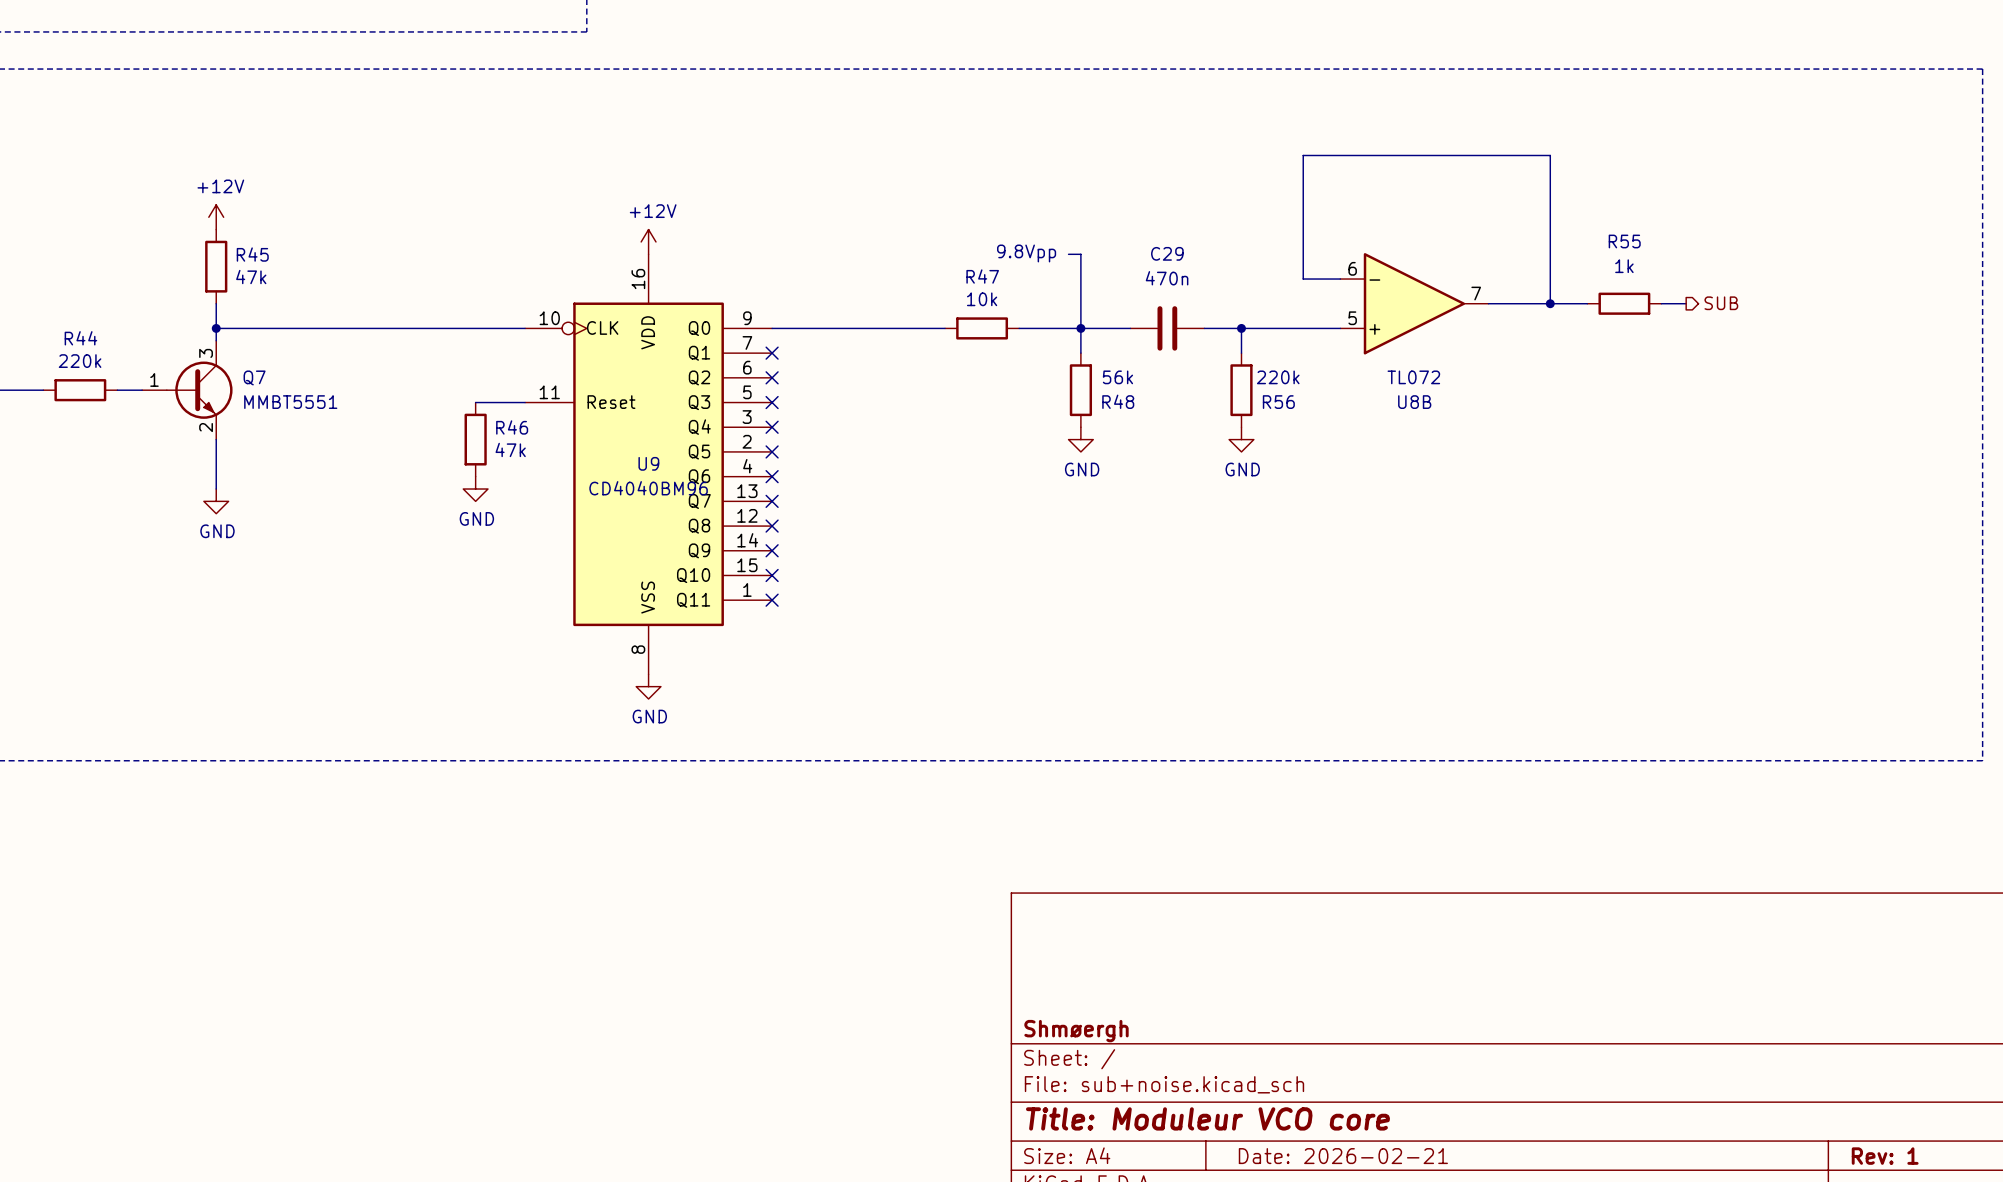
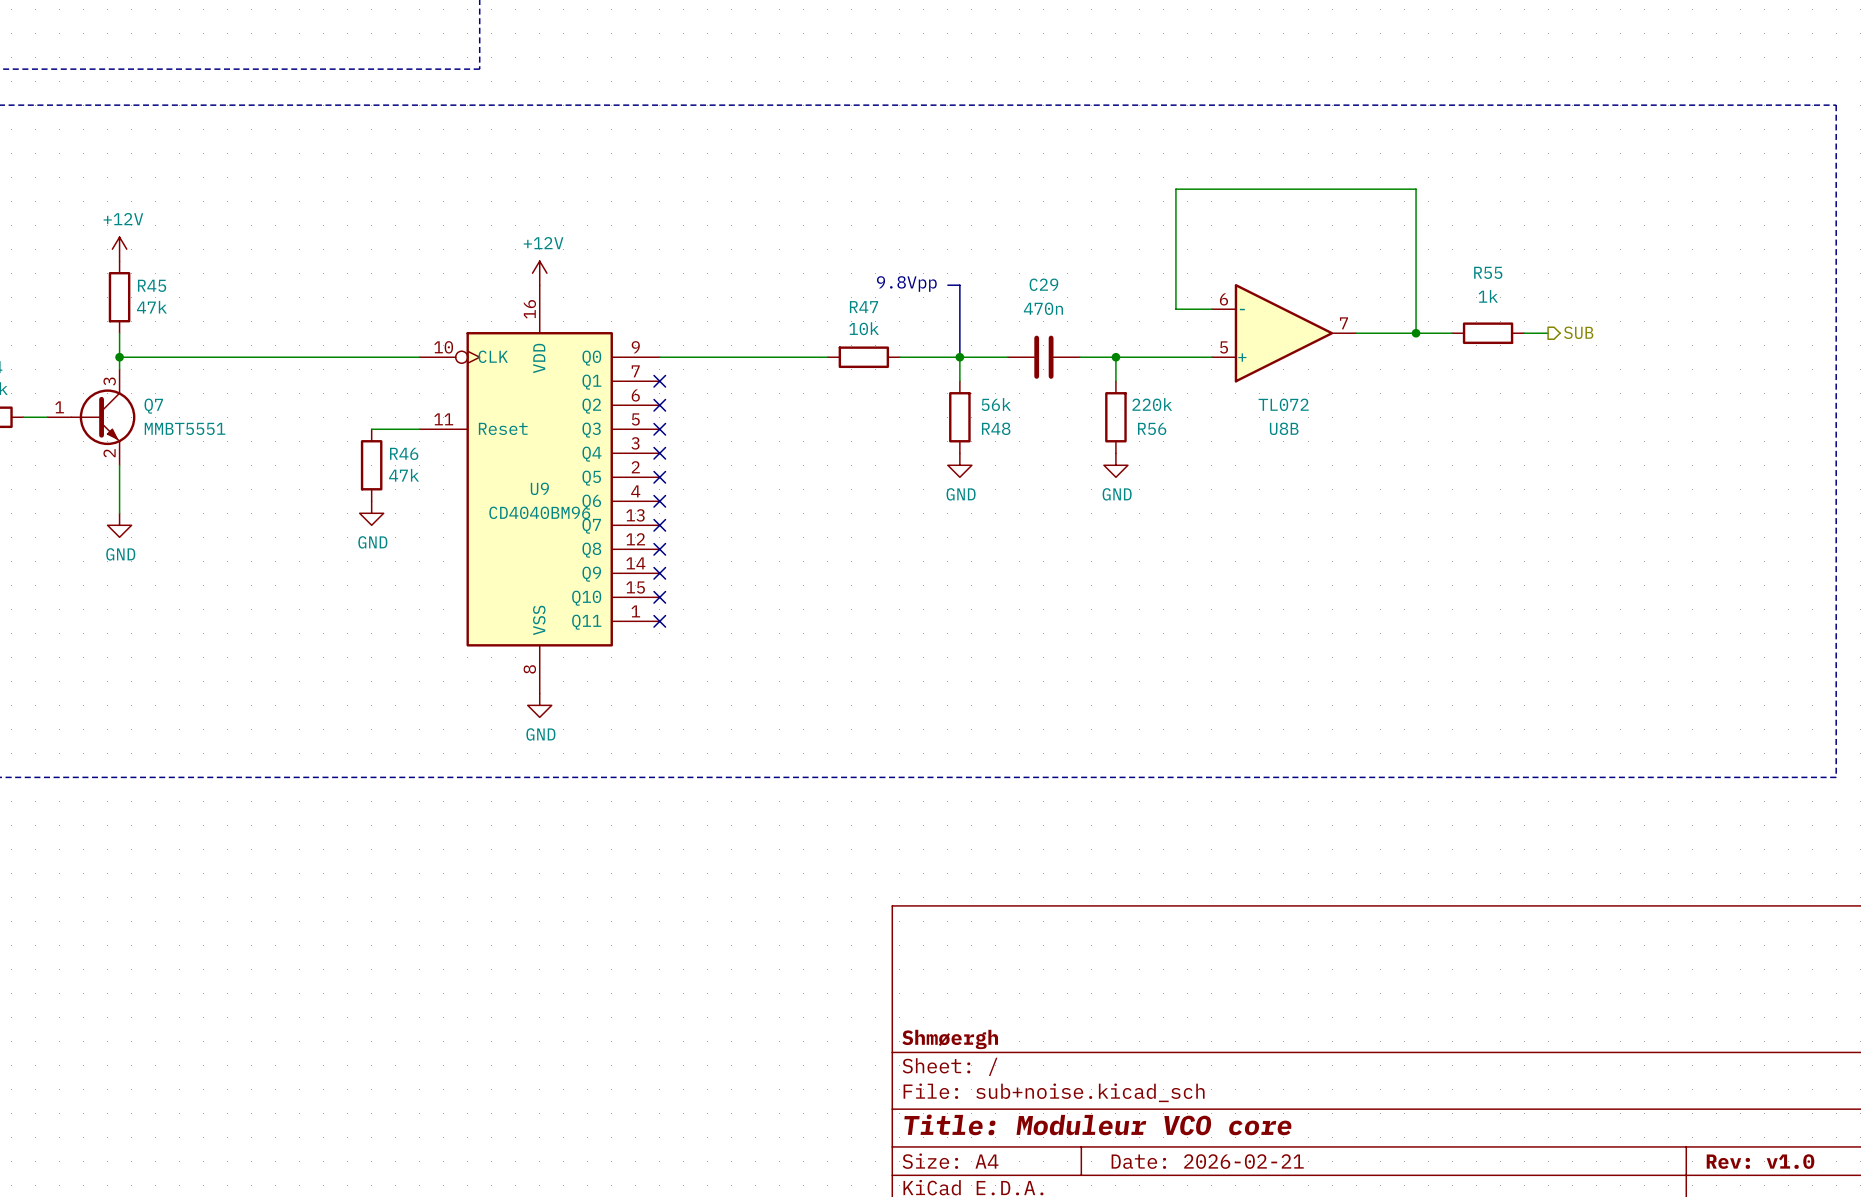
title block: Rev: 1 (1885, 1156) -> Rev: v1.0 (1760, 1161)

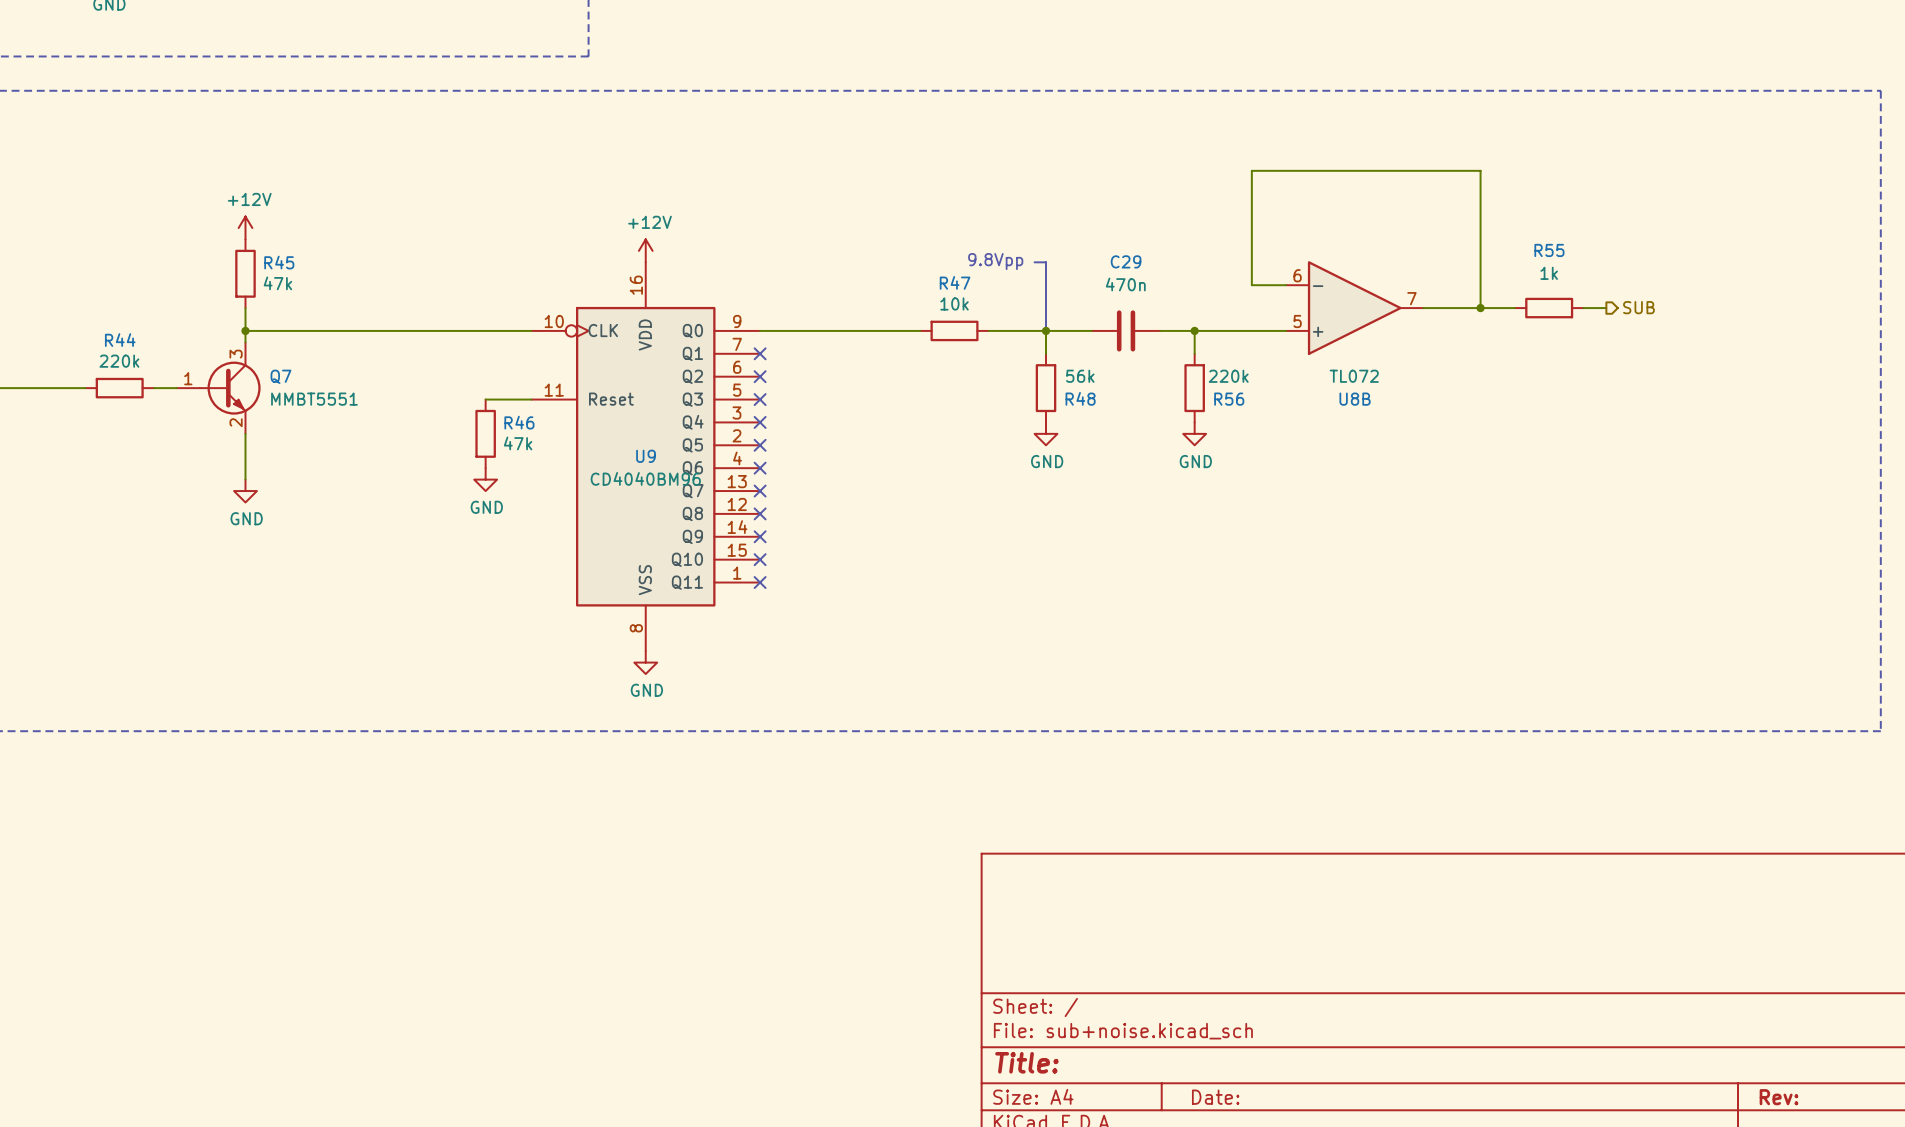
title block: Shmøergh (950, 1039) -> none
title block: Title: Moduleur VCO core (1097, 1124) -> Title: (1026, 1062)
title block: Date: 2026-02-21 (1207, 1161) -> Date: (1215, 1097)
title block: Rev: v1.0 (1760, 1161) -> Rev: (1779, 1097)

